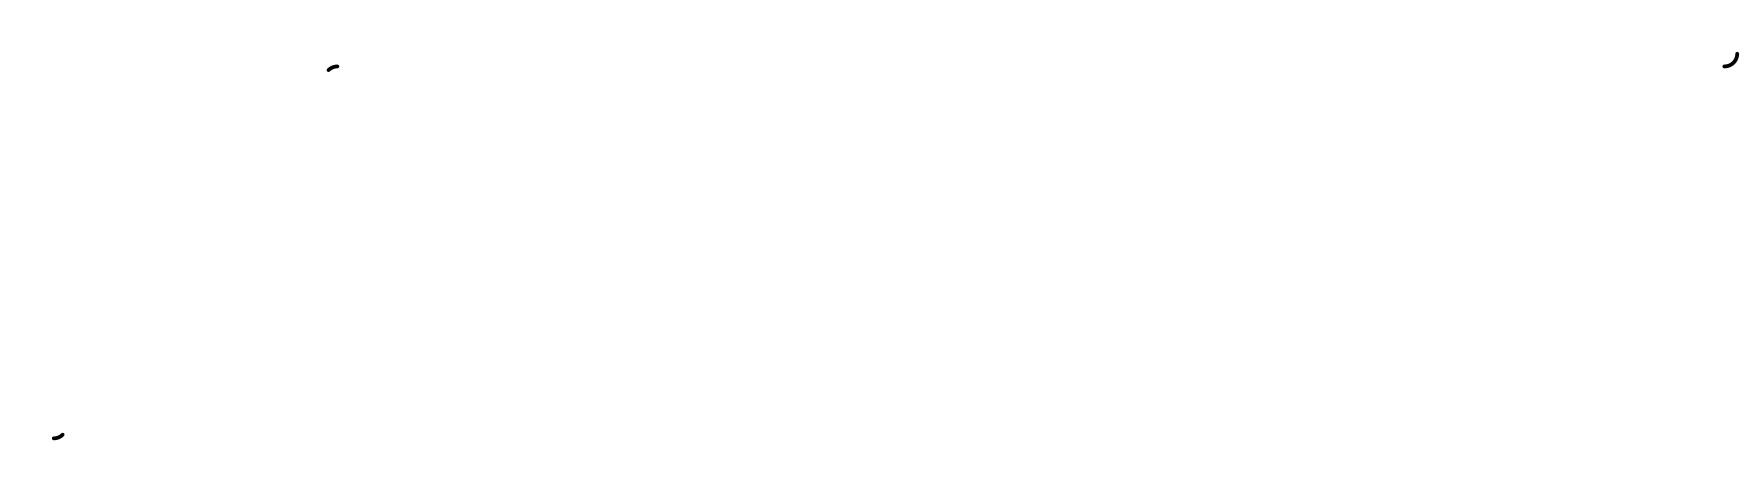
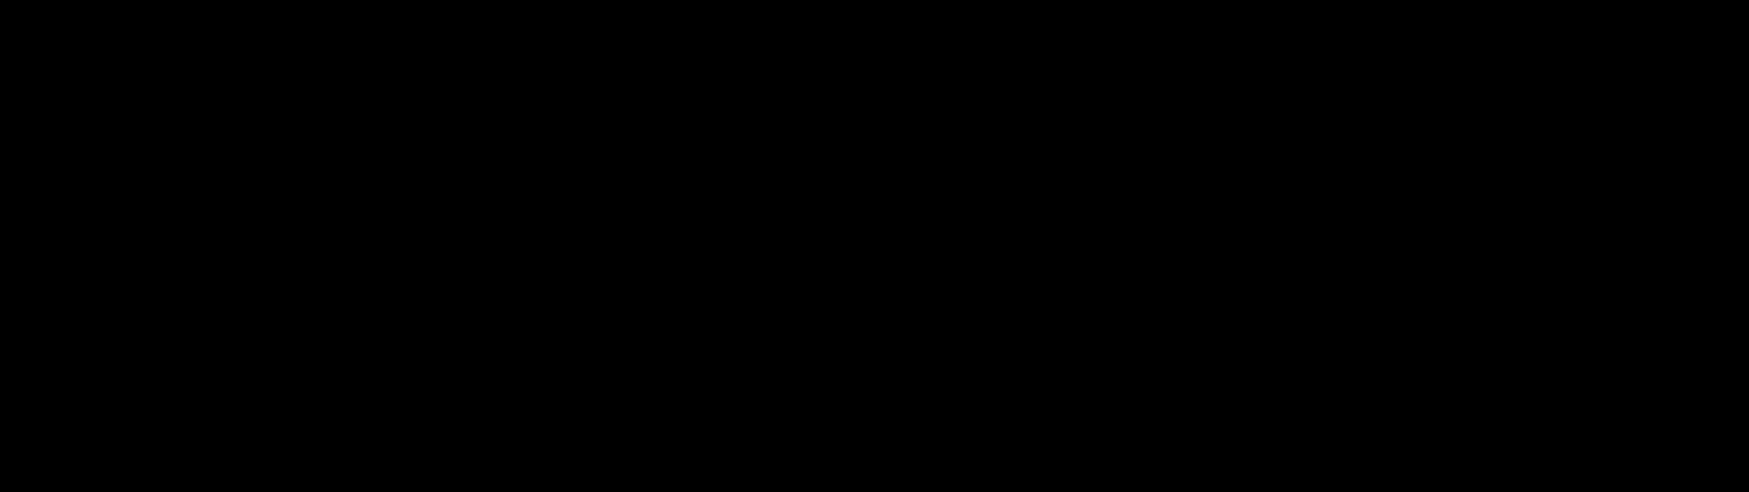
drawing: [51, 51, 1740, 441] -> none

